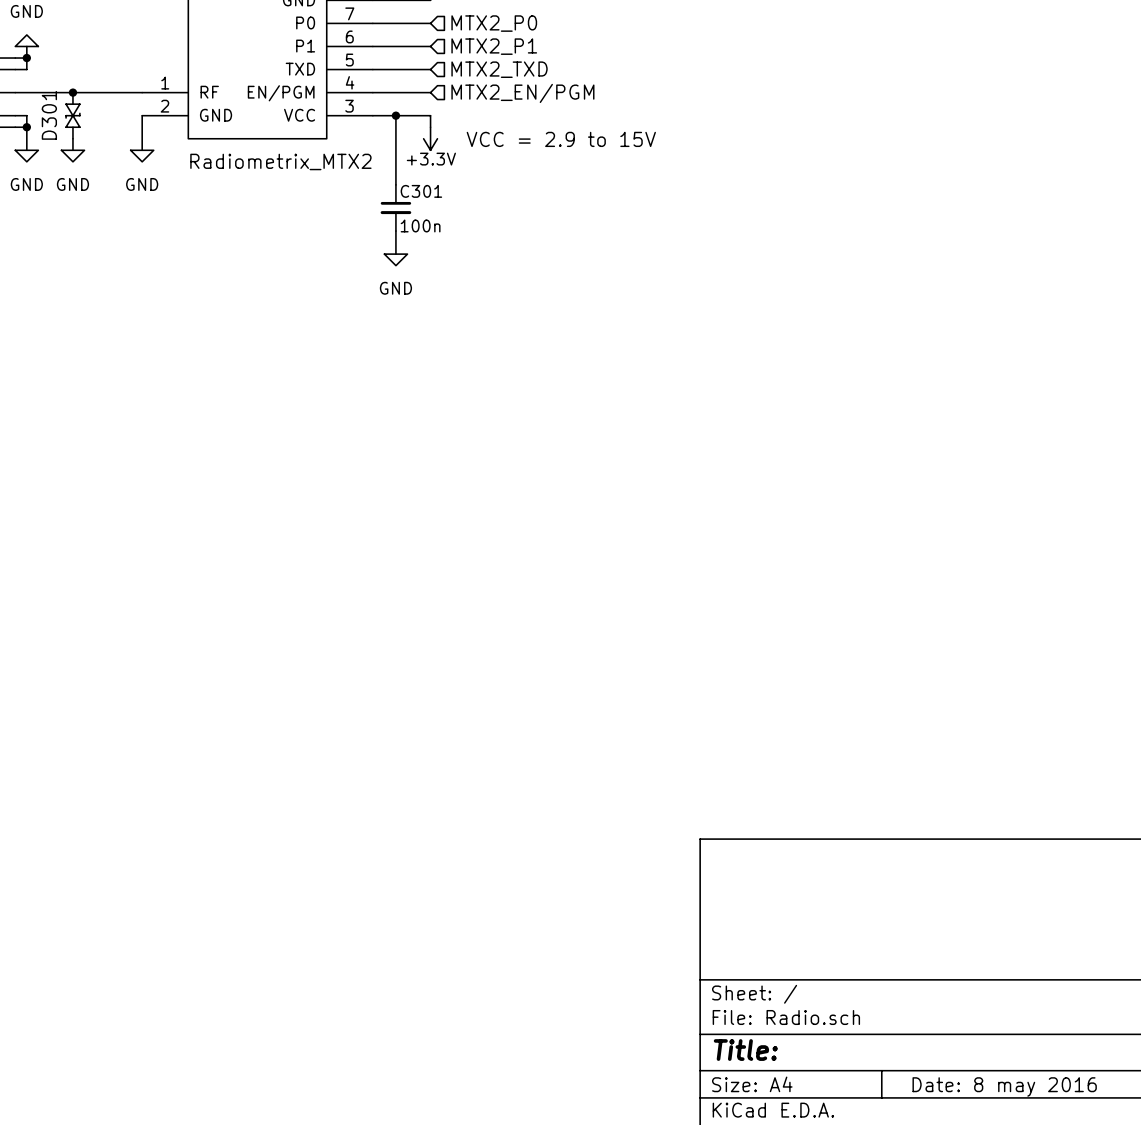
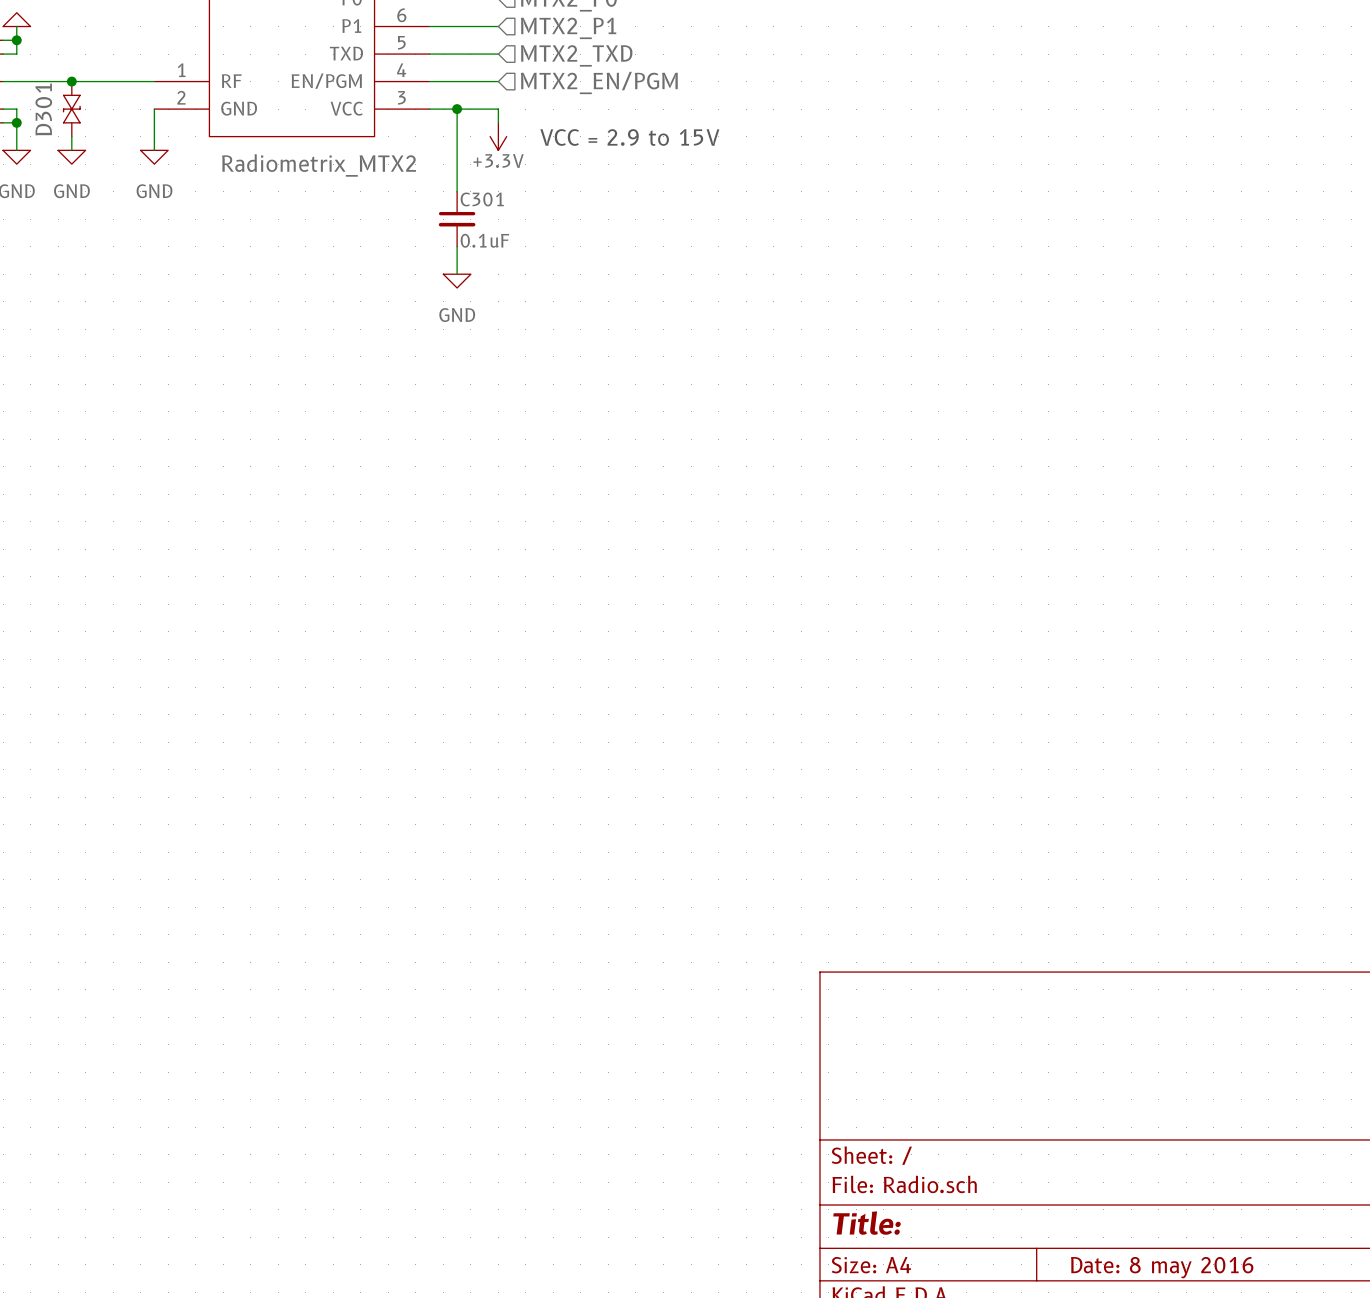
C301 value: 100n (420, 225) -> 0.1uF (484, 240)

